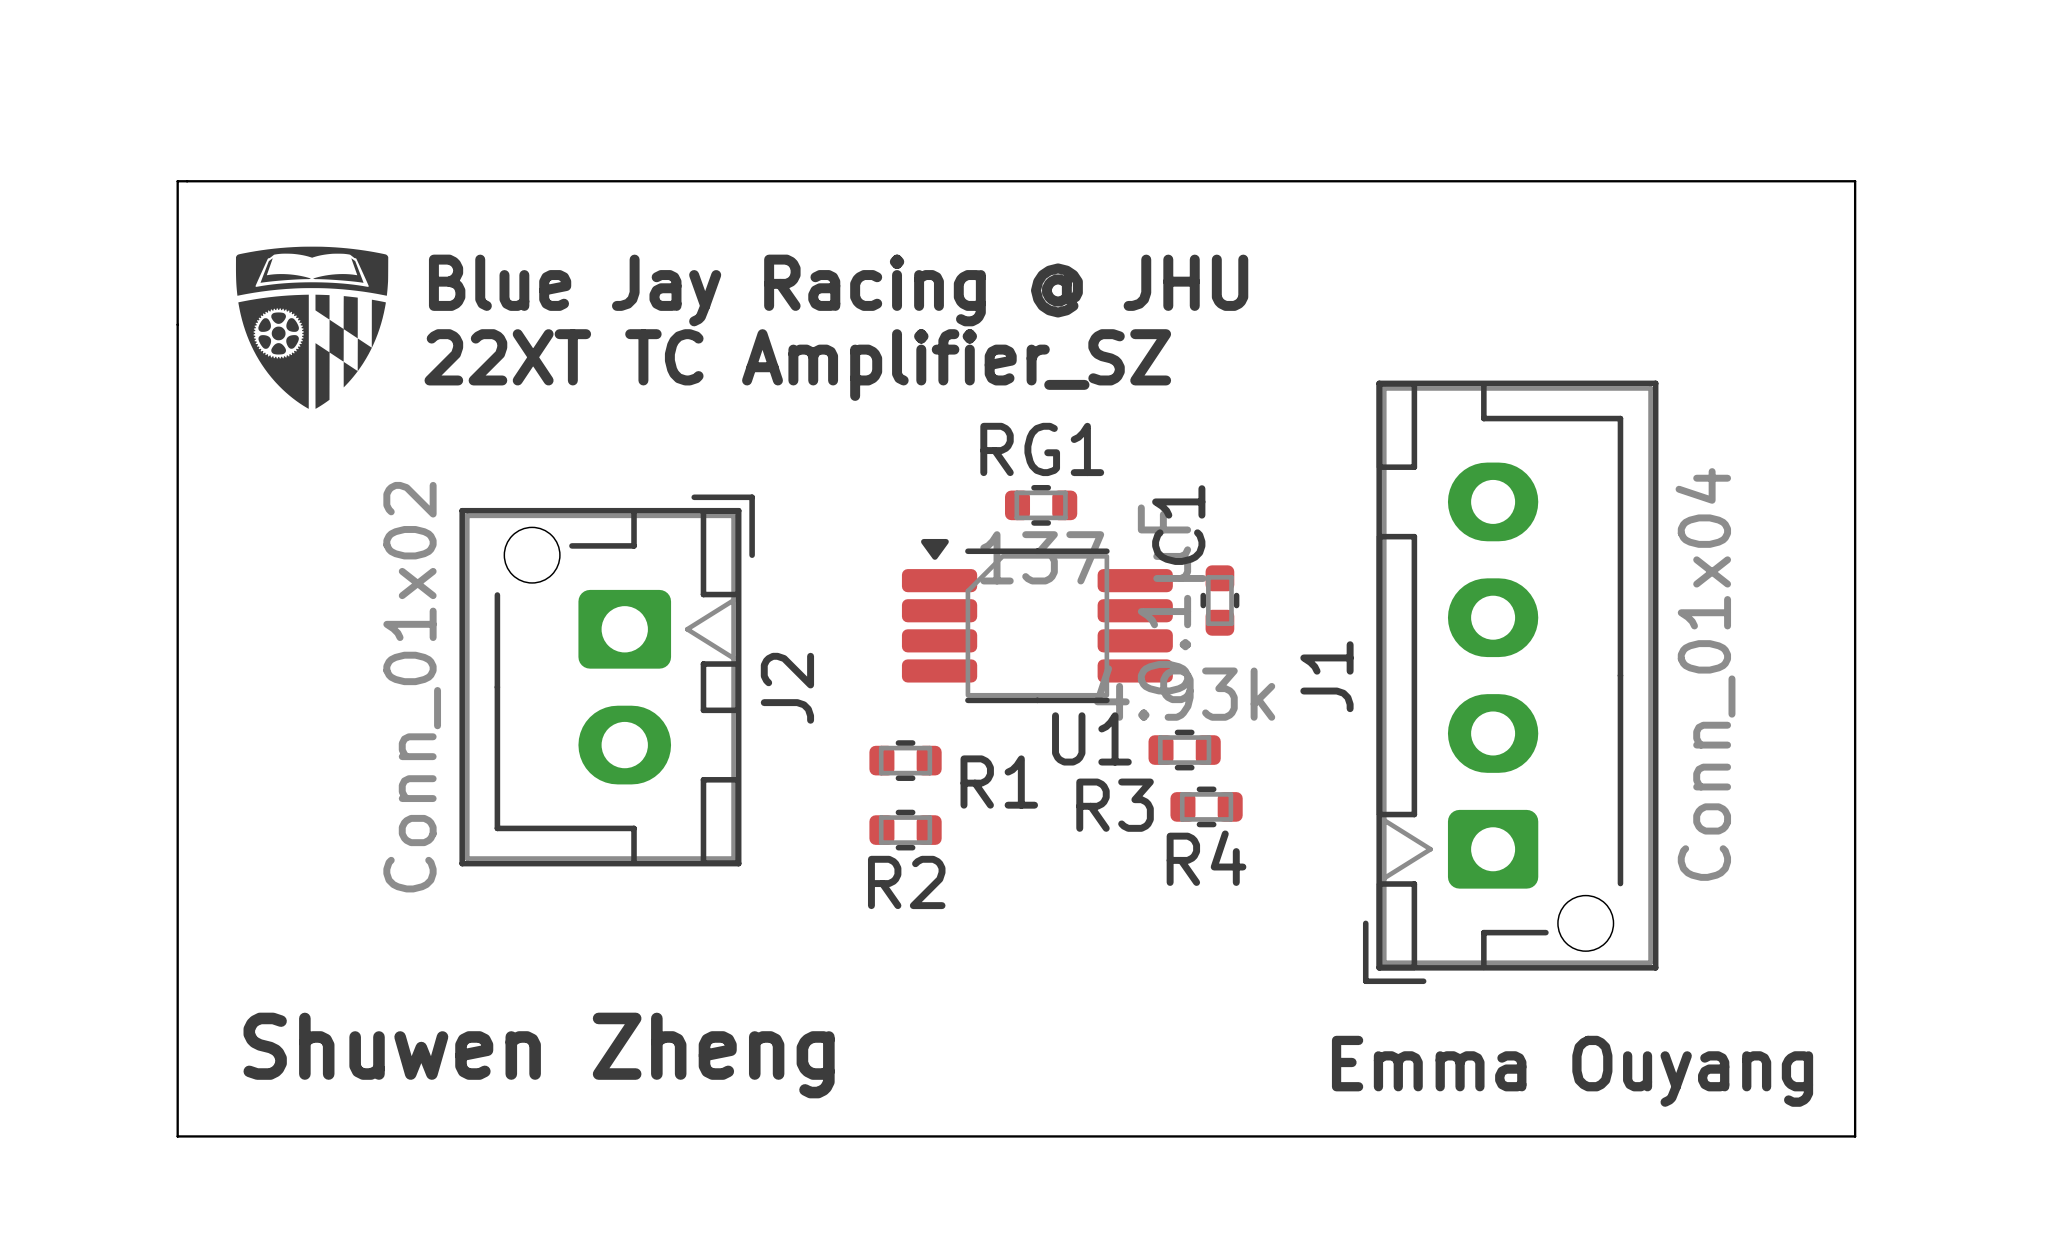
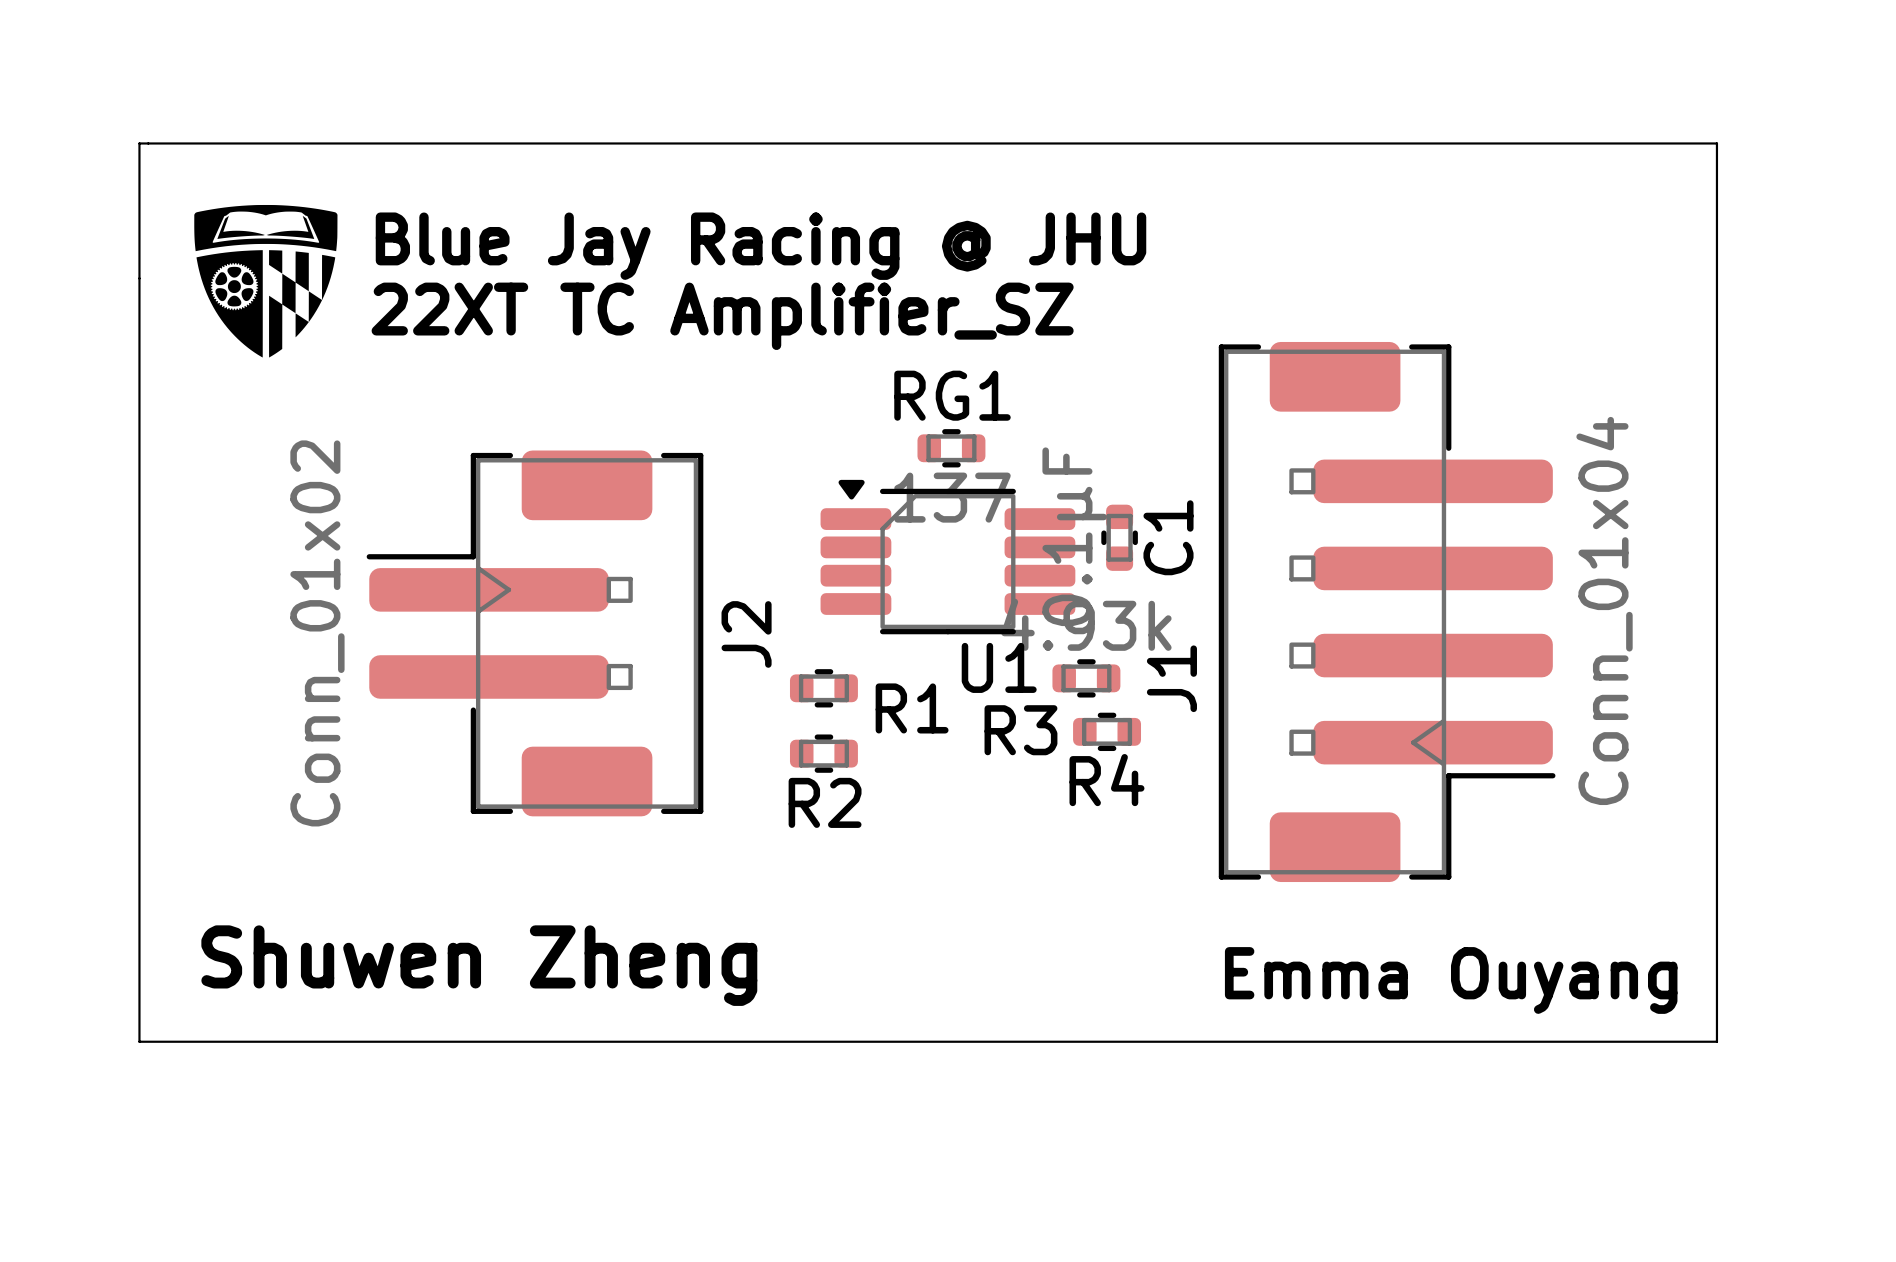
J1 footprint: [1362, 380, 1659, 985] -> [1218, 341, 1556, 883]
J2 footprint: [459, 494, 755, 867] -> [366, 450, 704, 817]
C1 name position: C1 (1178, 525) -> C1 (1168, 537)

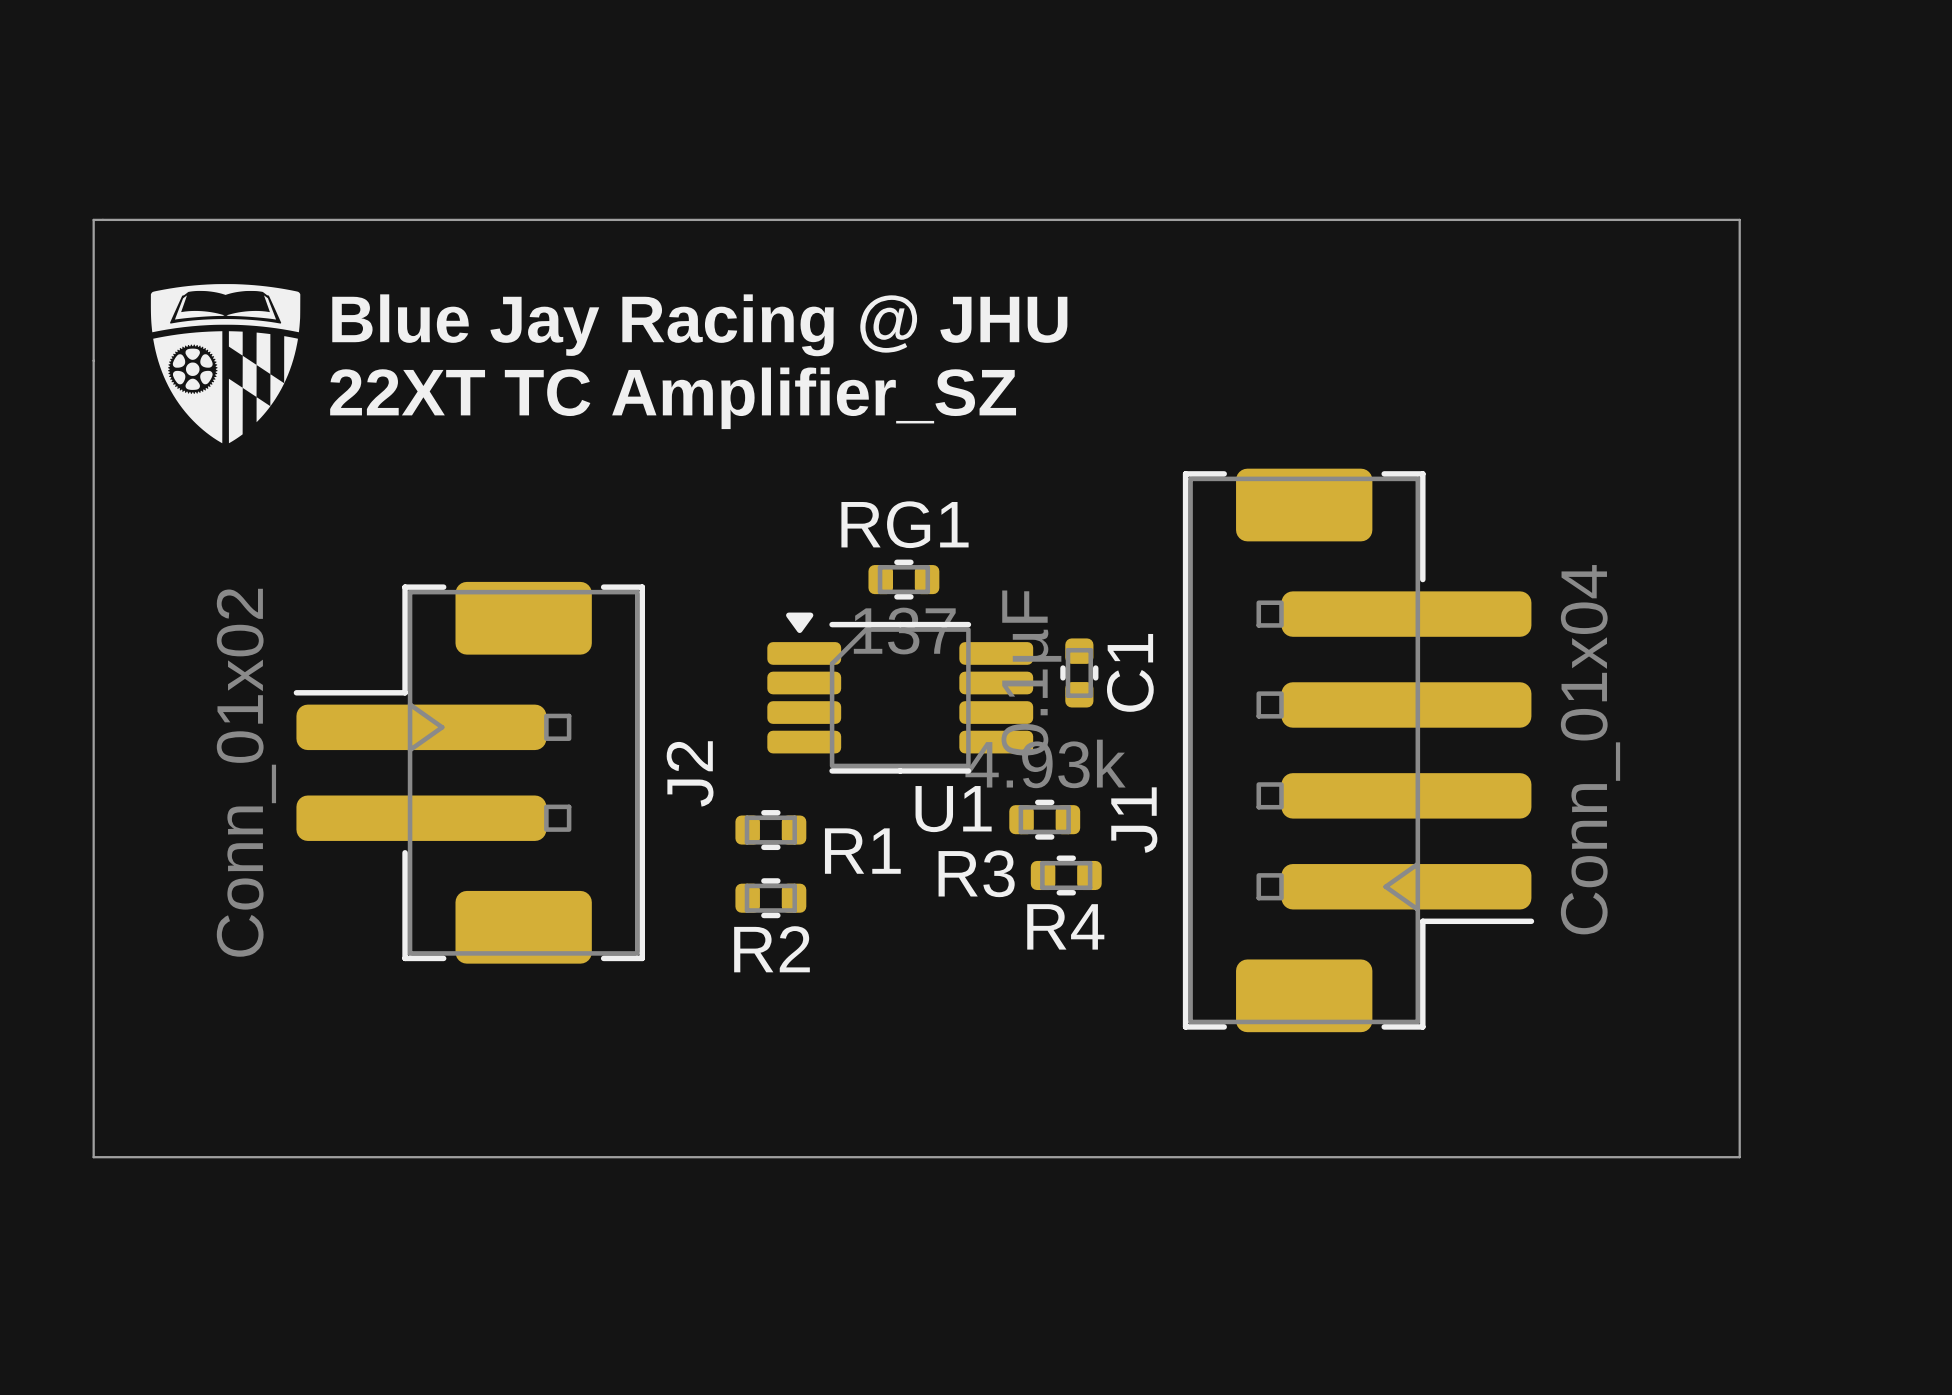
board edge: (139, 143) (139, 1041) (1716, 1041) (1716, 143) (139, 143) -> (93, 219) (93, 1157) (1739, 1157) (1739, 219) (93, 219)
text position: Blue Jay Racing @ JHU (761, 246) -> Blue Jay Racing @ JHU (699, 325)
drawing position: (265, 281) -> (225, 363)
text position: 22XT TC Amplifier_SZ (722, 316) -> 22XT TC Amplifier_SZ (673, 398)
text: Shuwen Zheng (479, 965) -> none
text: Emma Ouyang (1451, 980) -> none

